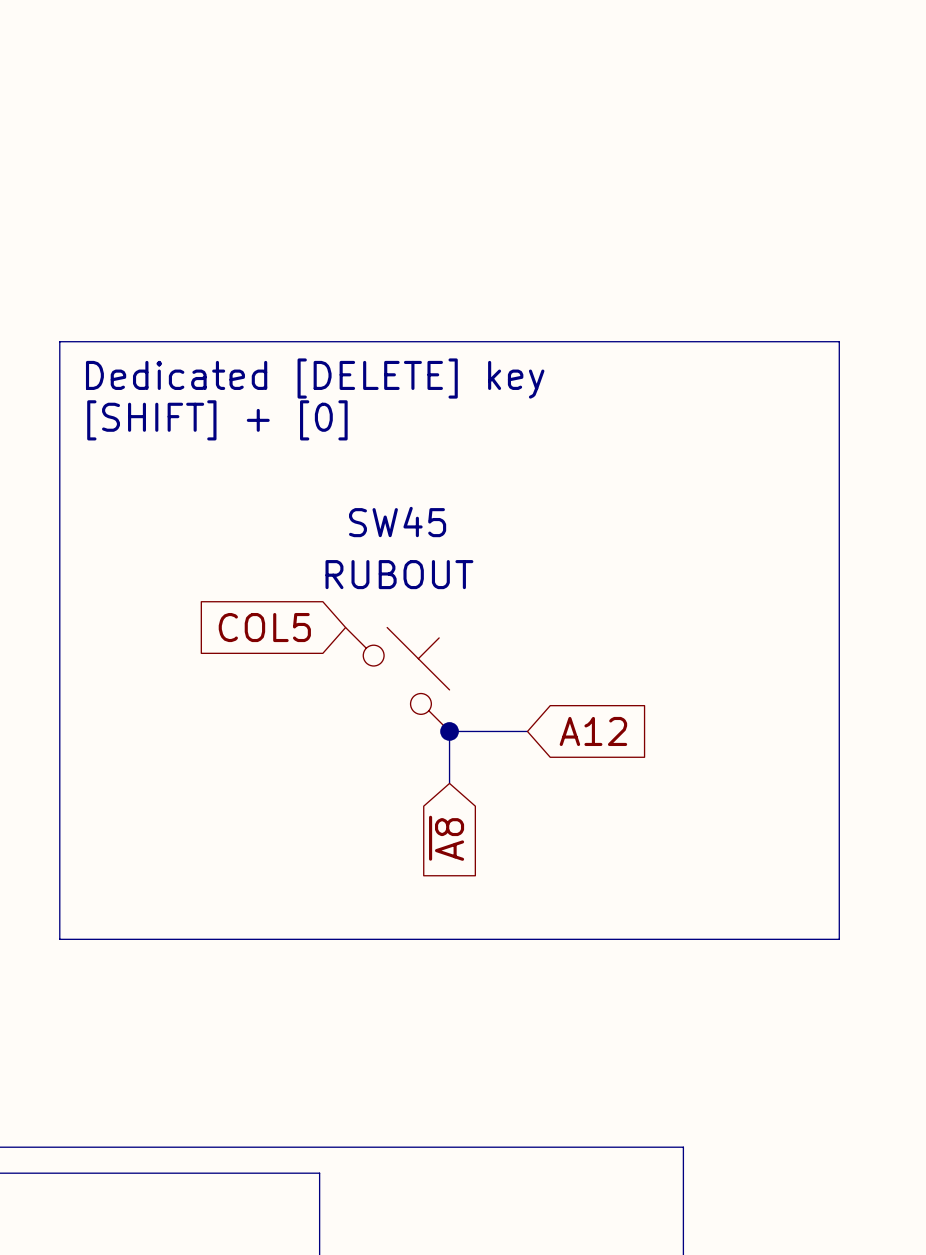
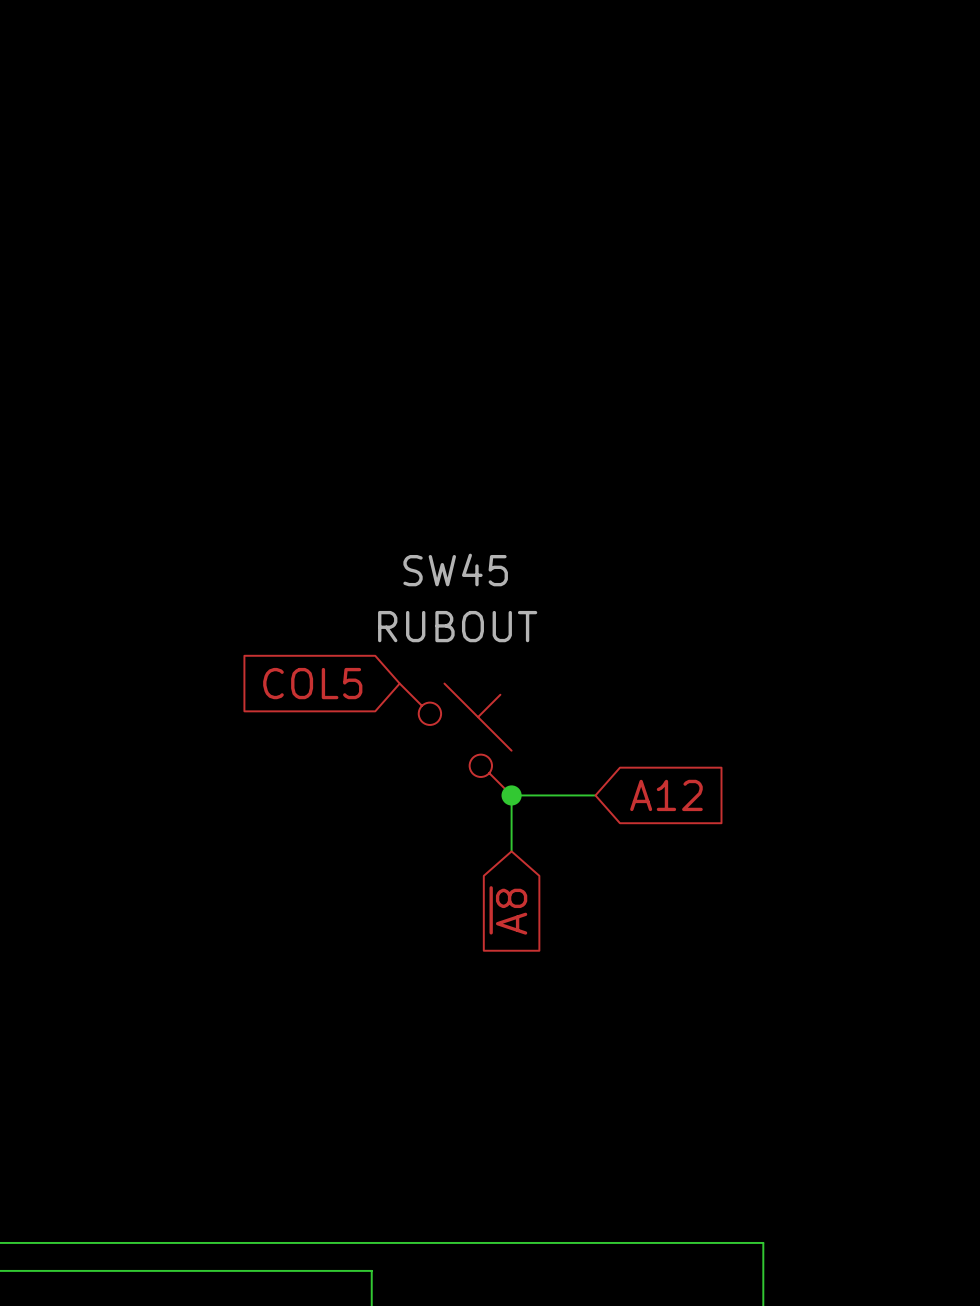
line: (59, 341) (839, 341) (839, 939) (59, 939) (59, 341) -> none
text: Dedicated [DELETE] key (315, 378) -> none
text: [SHIFT] + [0] (217, 420) -> none

